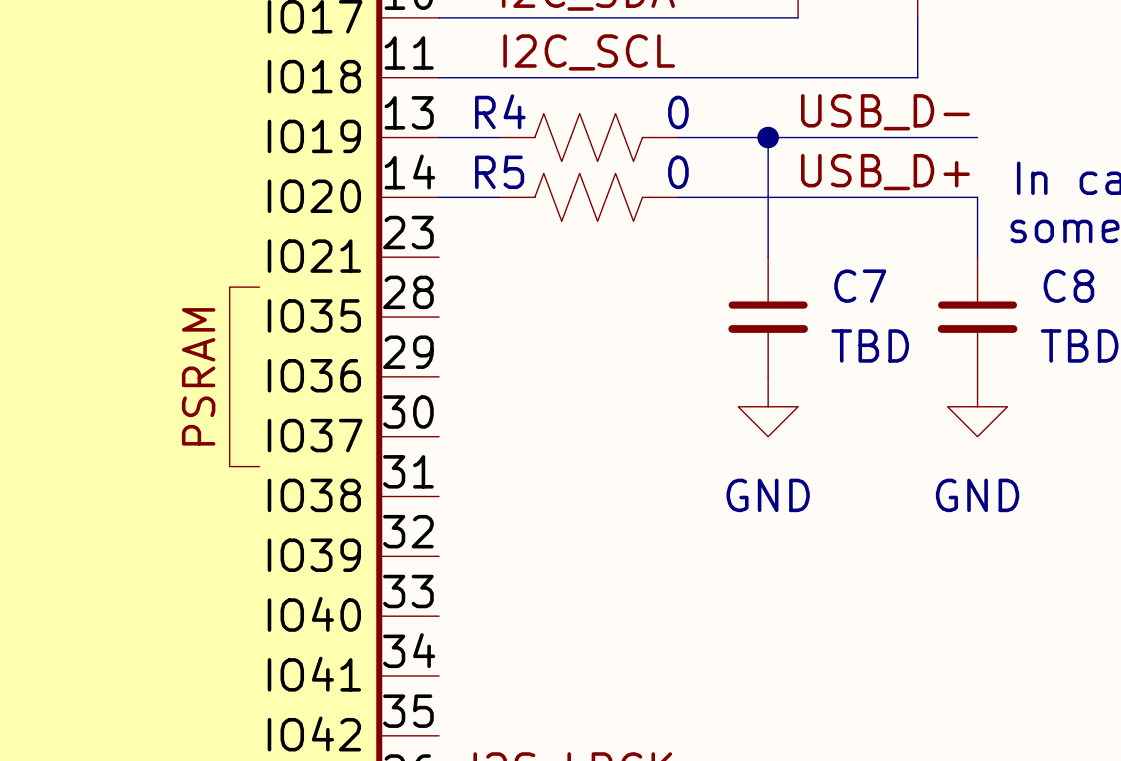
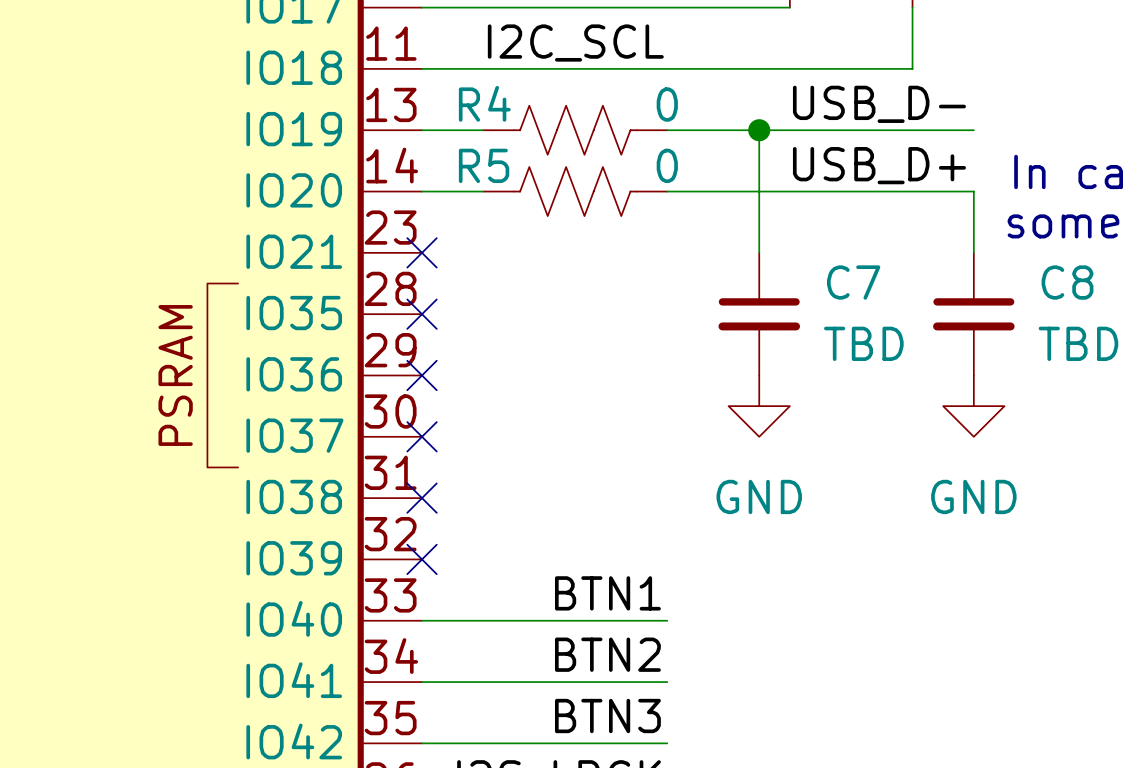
no-connect mark: none -> (422, 252)
no-connect mark: none -> (422, 314)
no-connect mark: none -> (422, 375)
no-connect mark: none -> (422, 436)
no-connect mark: none -> (422, 498)
no-connect mark: none -> (422, 559)
label: none -> BTN1 (607, 593)
wire: none -> (422, 620) (667, 620)
label: none -> BTN2 (607, 654)
wire: none -> (422, 682) (667, 682)
label: none -> BTN3 (607, 716)
wire: none -> (422, 743) (667, 743)

